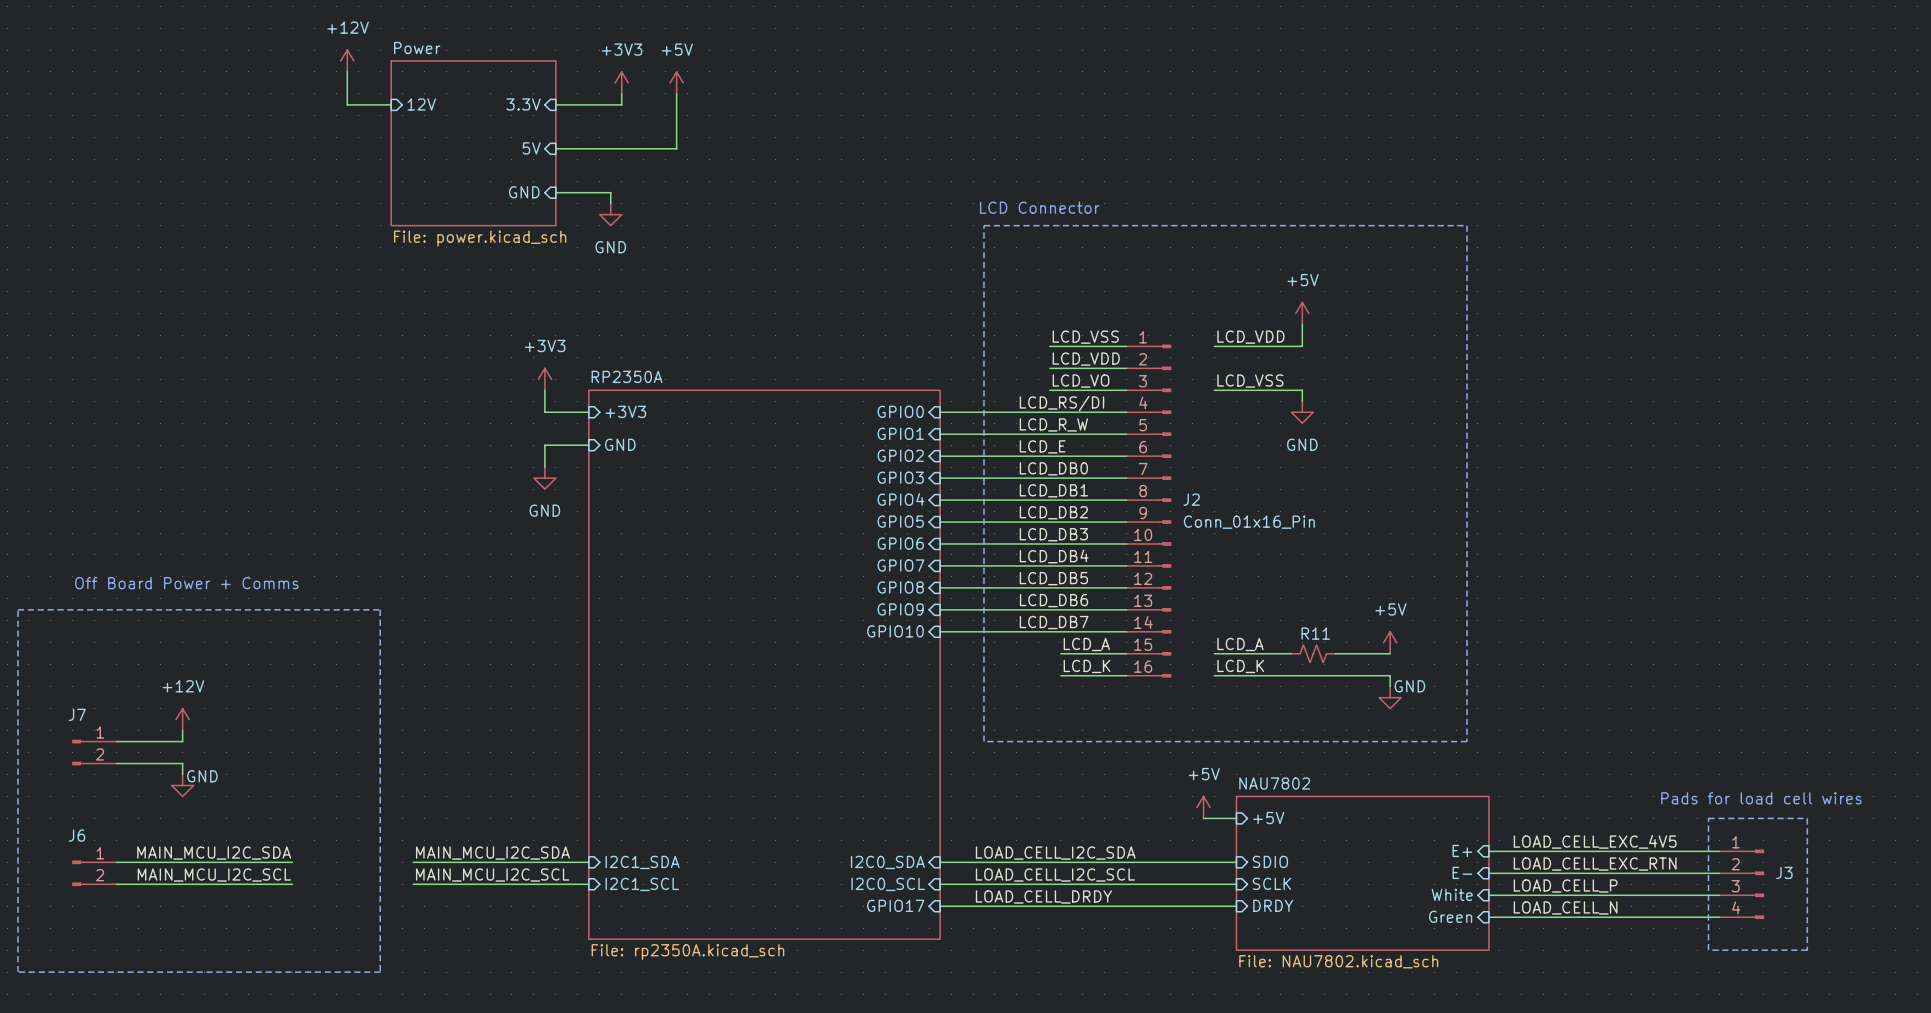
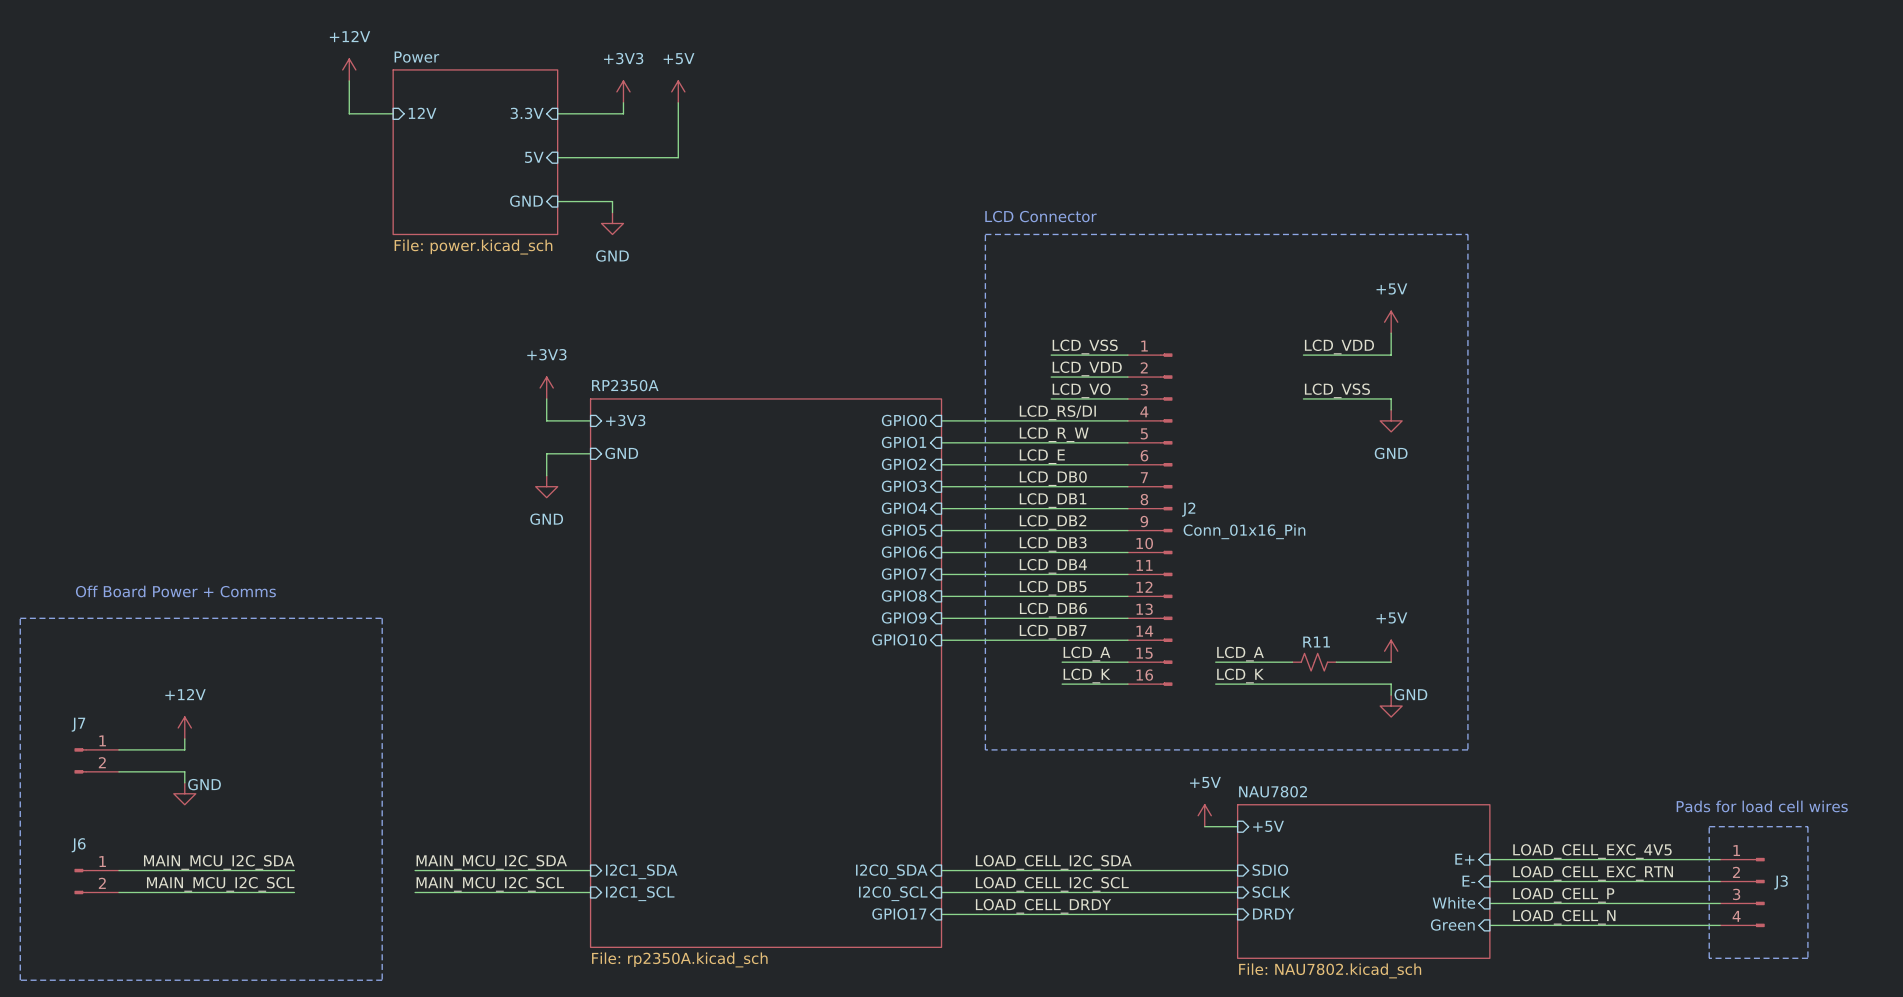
power symbol position: +5V (1302, 313) -> +5V (1391, 322)
wire: (1302, 324) (1302, 346) (1214, 346) -> (1391, 333) (1391, 355) (1303, 355)
label position: LCD_VDD (1250, 337) -> LCD_VDD (1339, 346)
label position: LCD_VSS (1250, 381) -> LCD_VSS (1337, 390)
wire: (1214, 390) (1302, 390) (1302, 401) -> (1303, 398) (1391, 398) (1391, 409)
power symbol position: GND (1302, 412) -> GND (1391, 420)

